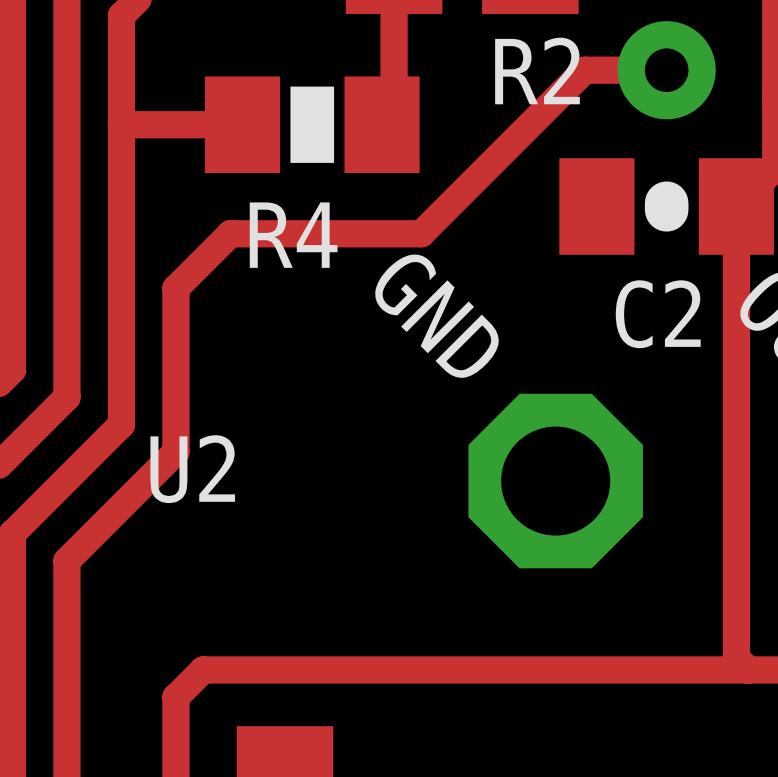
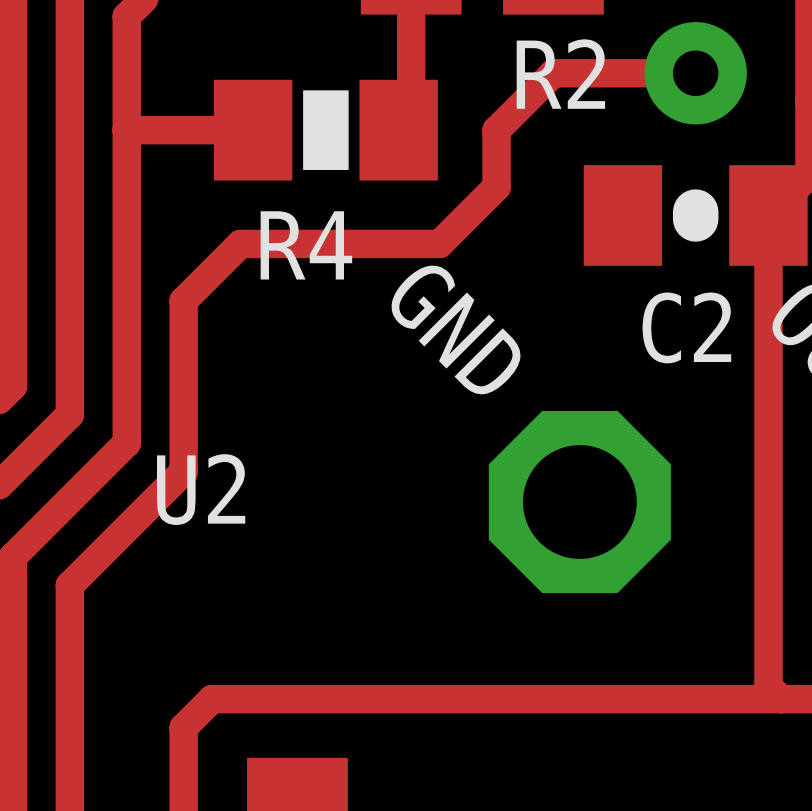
track: (584, 70) (475, 179) -> (610, 73) (553, 73) (496, 130) (496, 187)

